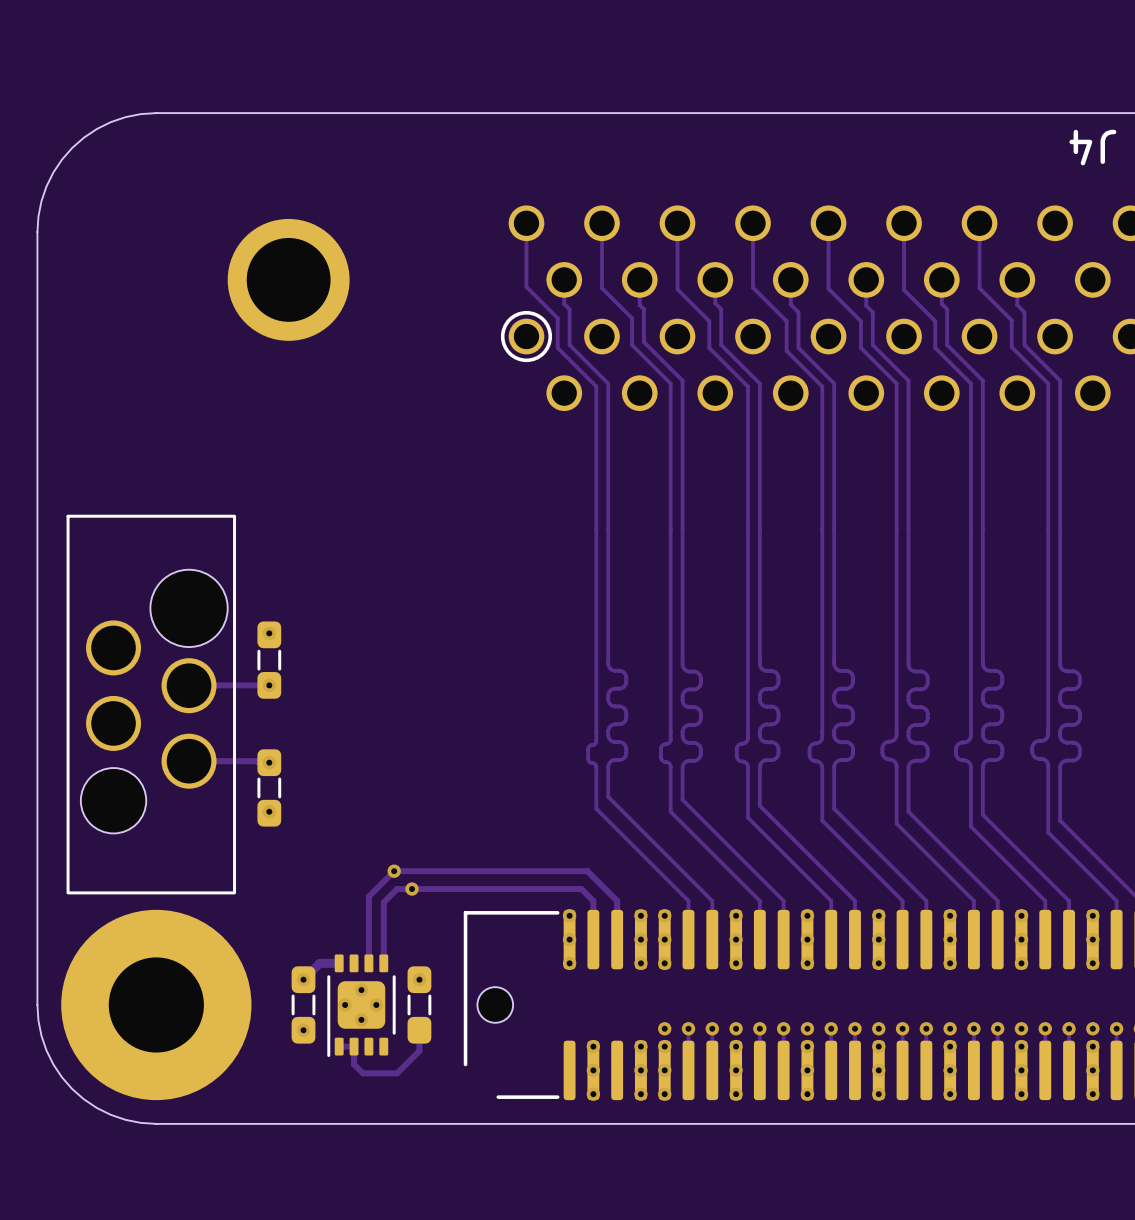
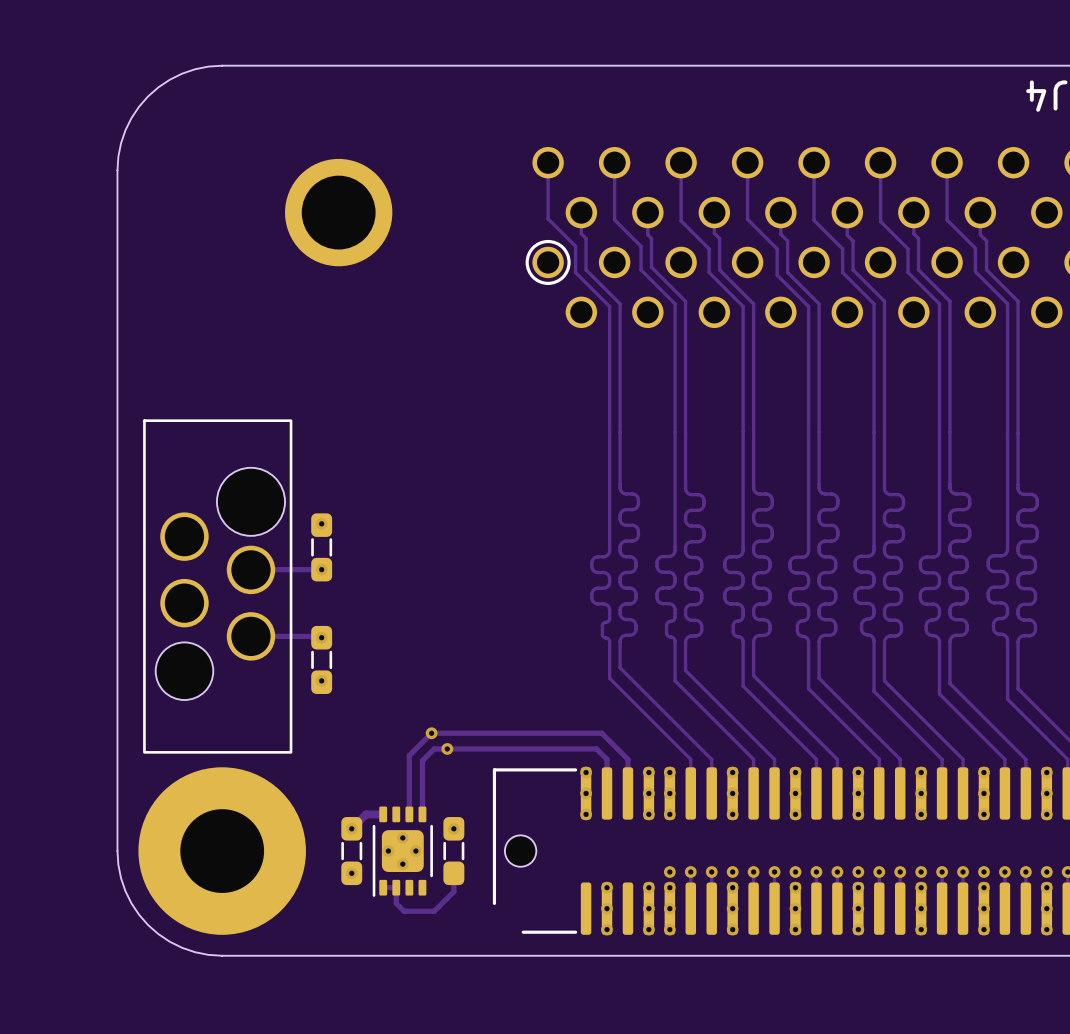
track: (608, 592) (608, 624) -> (620, 487) (623, 492) (634, 494) (638, 500) (636, 508) (623, 510) (620, 515)
track: (759, 592) (759, 624) -> (753, 487) (757, 493) (769, 495) (772, 500) (769, 508) (757, 510) (753, 516)
track: (834, 592) (834, 624) -> (819, 487) (822, 493) (834, 494) (837, 500) (835, 508) (822, 510) (819, 516)
track: (982, 592) (982, 624) -> (949, 487) (952, 493) (966, 494) (969, 500) (967, 508) (953, 510) (949, 515)
track: (1060, 592) (1060, 624) -> (1018, 488) (1021, 493) (1034, 495) (1037, 500) (1034, 508) (1021, 510) (1018, 516)
track: (682, 593) (682, 625) -> (685, 488) (688, 493) (700, 495) (704, 500) (701, 508) (689, 510) (685, 516)
track: (908, 593) (908, 625) -> (884, 488) (887, 493) (899, 495) (903, 500) (901, 508) (888, 510) (884, 516)
track: (608, 627) (608, 660) -> (620, 519) (623, 524) (634, 525) (638, 531) (636, 539) (623, 541) (620, 547)
track: (682, 628) (682, 660) -> (685, 519) (688, 525) (700, 526) (704, 532) (701, 540) (689, 542) (685, 548)
track: (759, 628) (759, 660) -> (753, 519) (756, 524) (768, 526) (772, 531) (769, 539) (757, 541) (753, 547)
track: (834, 628) (834, 660) -> (819, 519) (822, 524) (834, 526) (837, 531) (835, 539) (822, 541) (819, 547)
track: (908, 628) (908, 660) -> (884, 519) (887, 525) (899, 526) (903, 532) (901, 540) (888, 542) (884, 548)
track: (982, 628) (982, 660) -> (949, 519) (952, 524) (966, 526) (969, 531) (967, 539) (953, 541) (949, 547)
track: (1060, 628) (1060, 660) -> (1018, 519) (1020, 524) (1033, 526) (1037, 532) (1034, 540) (1021, 542) (1018, 547)
track: (1048, 662) (1048, 694) -> (1007, 549) (1004, 554) (991, 556) (988, 562) (990, 570) (1003, 572) (1007, 577)
track: (596, 663) (596, 695) -> (609, 550) (606, 556) (594, 557) (591, 563) (594, 571) (606, 573) (609, 578)
track: (670, 663) (670, 695) -> (675, 550) (671, 555) (659, 557) (656, 562) (659, 570) (671, 572) (675, 578)
track: (747, 663) (747, 695) -> (743, 550) (739, 556) (727, 557) (724, 563) (727, 571) (739, 573) (743, 578)
track: (896, 663) (896, 695) -> (874, 550) (871, 555) (858, 556) (855, 562) (857, 570) (870, 572) (874, 578)
track: (970, 663) (970, 696) -> (939, 550) (935, 556) (923, 558) (920, 563) (922, 571) (935, 573) (939, 579)
track: (822, 664) (822, 696) -> (808, 550) (805, 556) (792, 558) (789, 563) (792, 571) (805, 573) (808, 579)
track: (896, 698) (896, 730) -> (874, 581) (871, 586) (858, 588) (855, 594) (857, 602) (870, 604) (874, 609)
track: (1048, 698) (1048, 730) -> (1007, 580) (1003, 586) (991, 588) (988, 593) (990, 601) (1003, 603) (1007, 609)
track: (596, 699) (596, 731) -> (609, 581) (606, 587) (595, 588) (591, 594) (594, 602) (606, 604) (609, 610)
track: (670, 699) (670, 731) -> (675, 581) (671, 587) (659, 588) (656, 594) (659, 602) (671, 604) (675, 609)
track: (747, 699) (747, 731) -> (743, 581) (740, 587) (728, 588) (724, 594) (727, 602) (739, 604) (743, 610)
track: (822, 699) (822, 731) -> (808, 582) (805, 588) (792, 589) (789, 594) (792, 602) (805, 604) (808, 610)
track: (970, 699) (970, 731) -> (939, 582) (936, 587) (923, 589) (920, 594) (922, 602) (935, 604) (939, 610)

